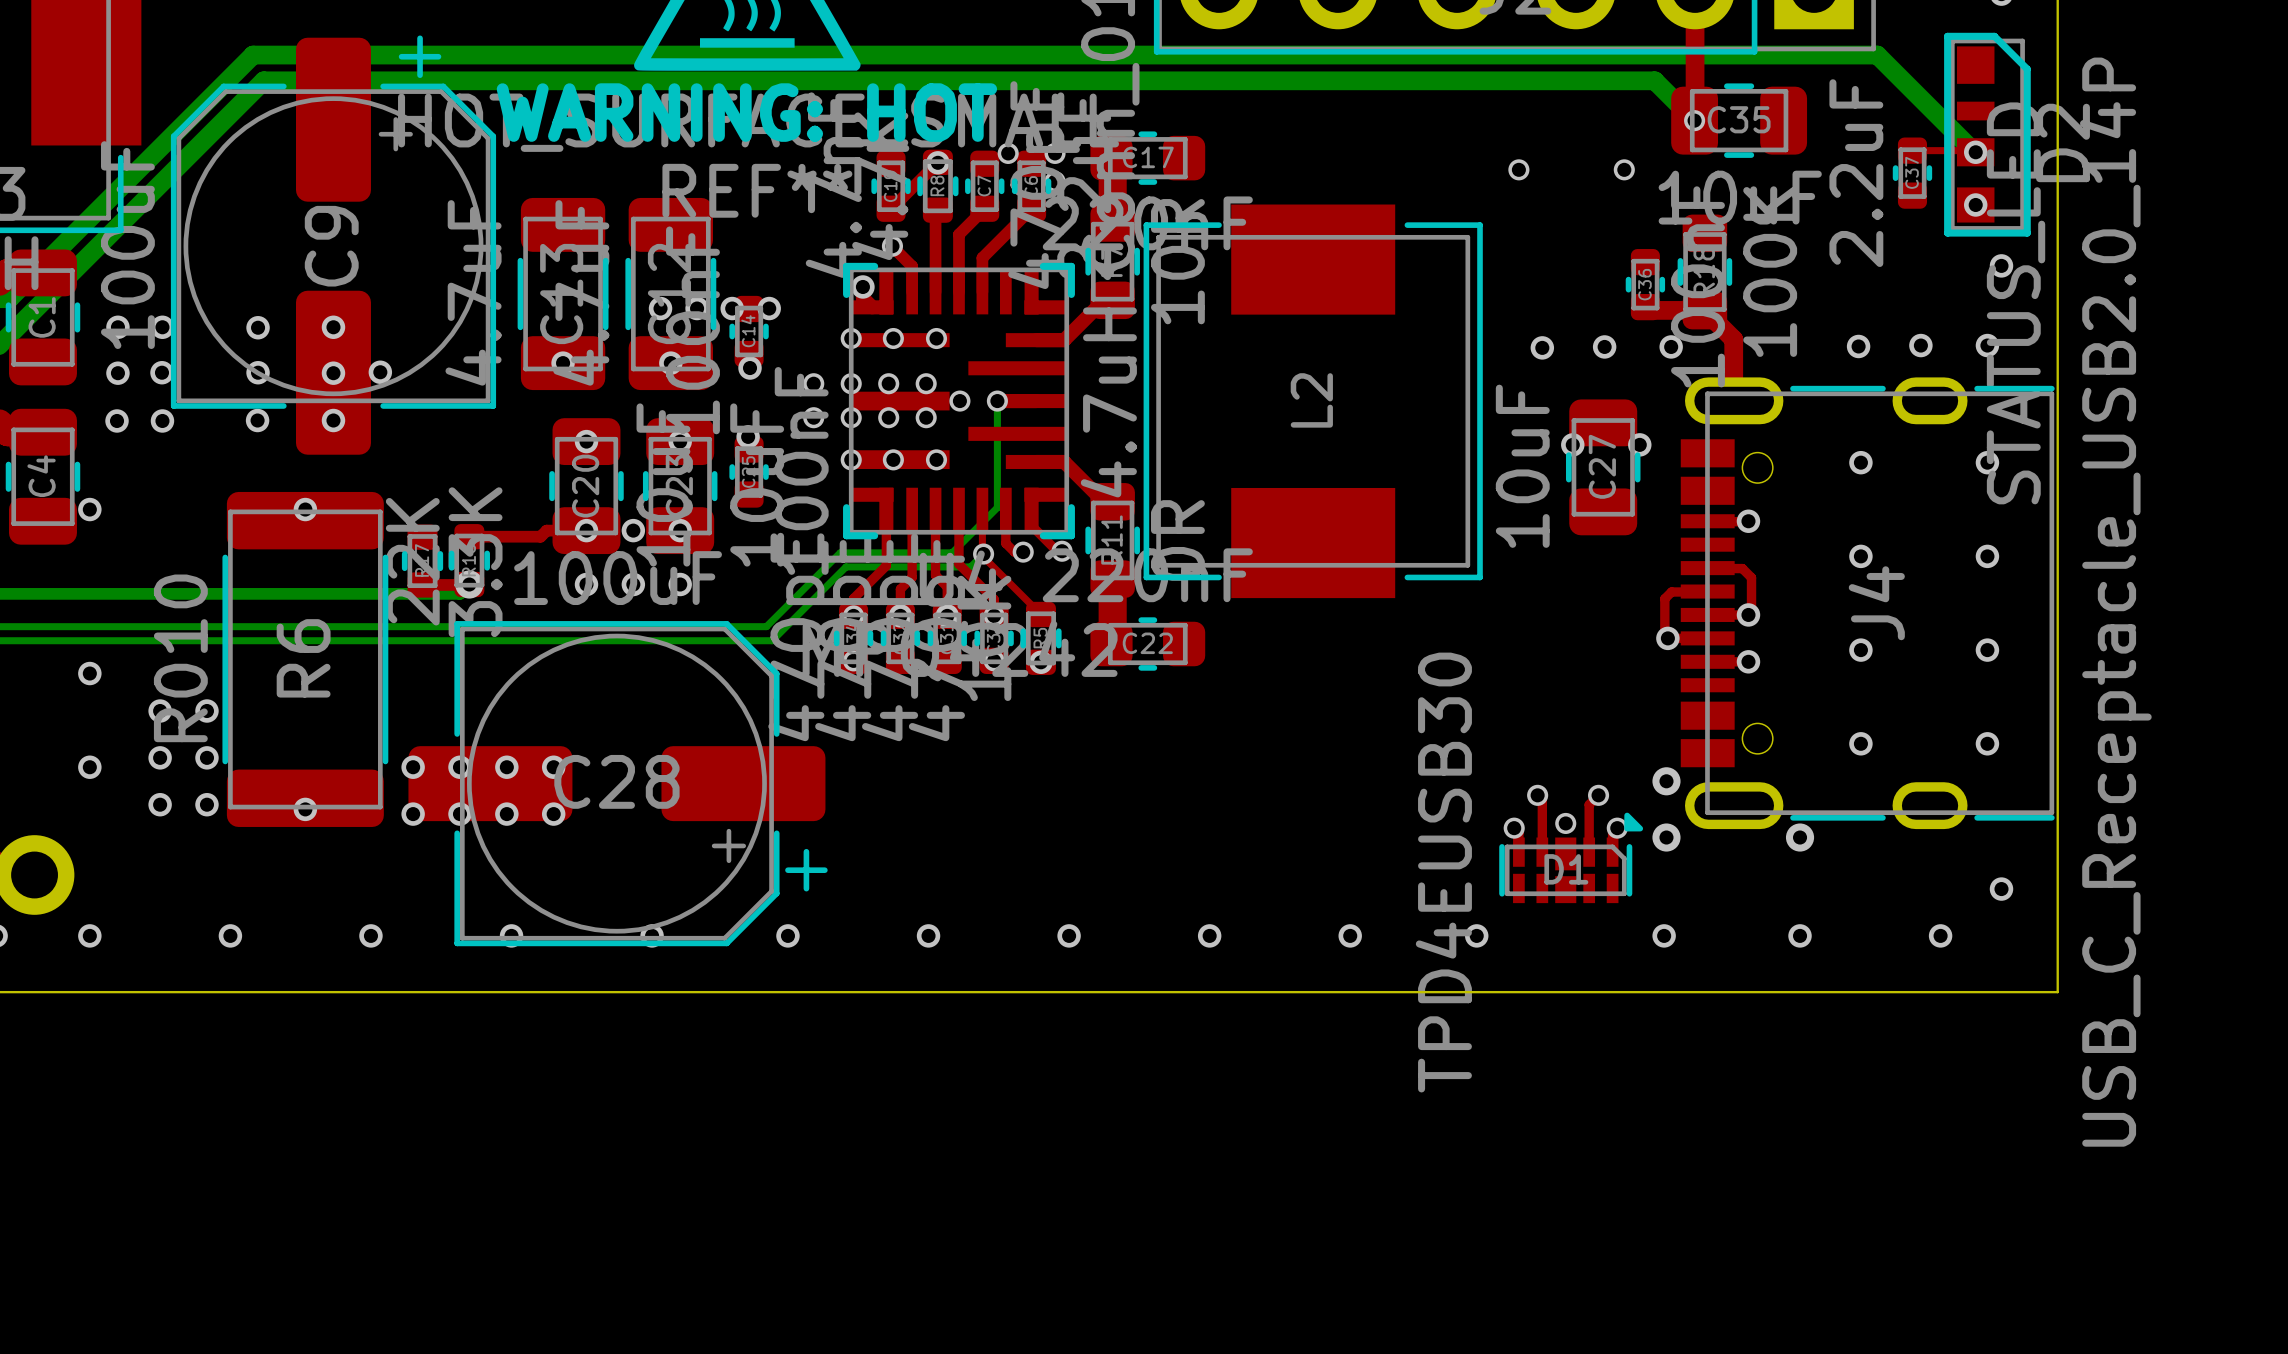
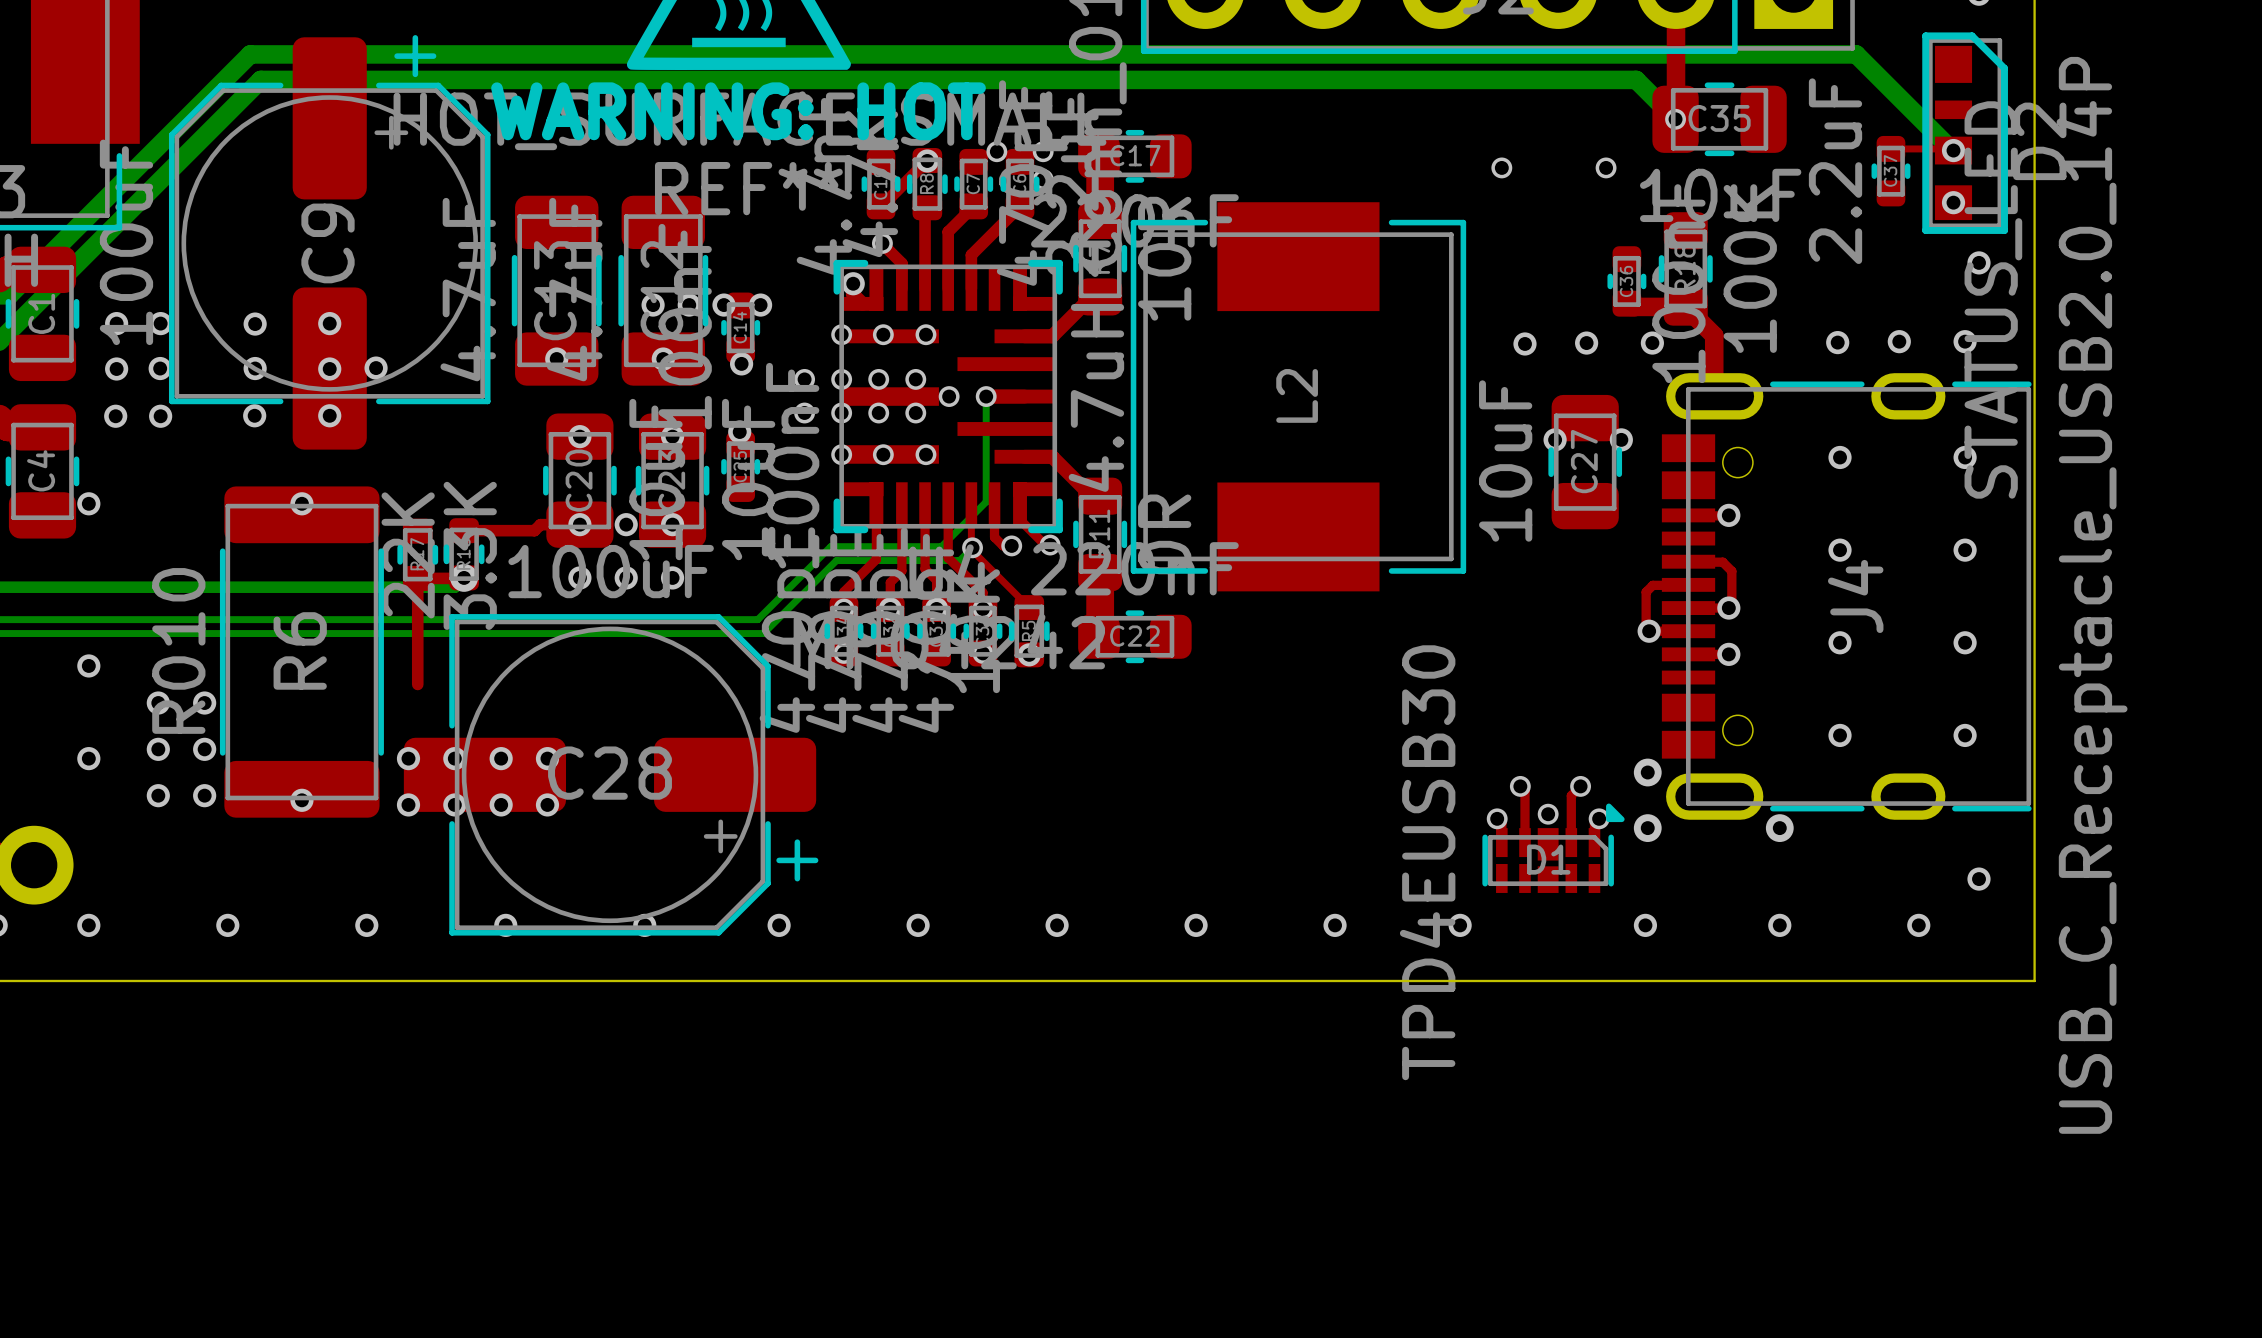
top track: none -> (417, 578) (417, 684)

